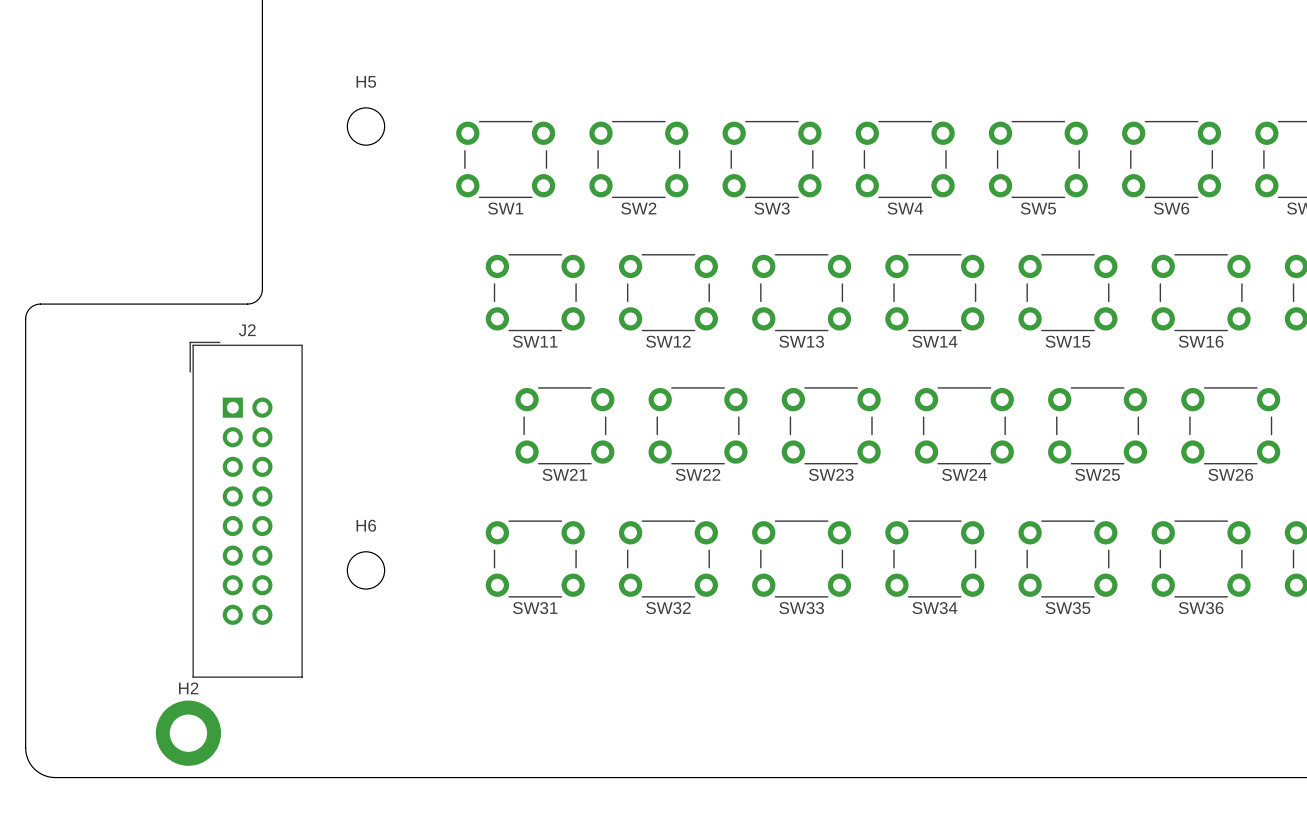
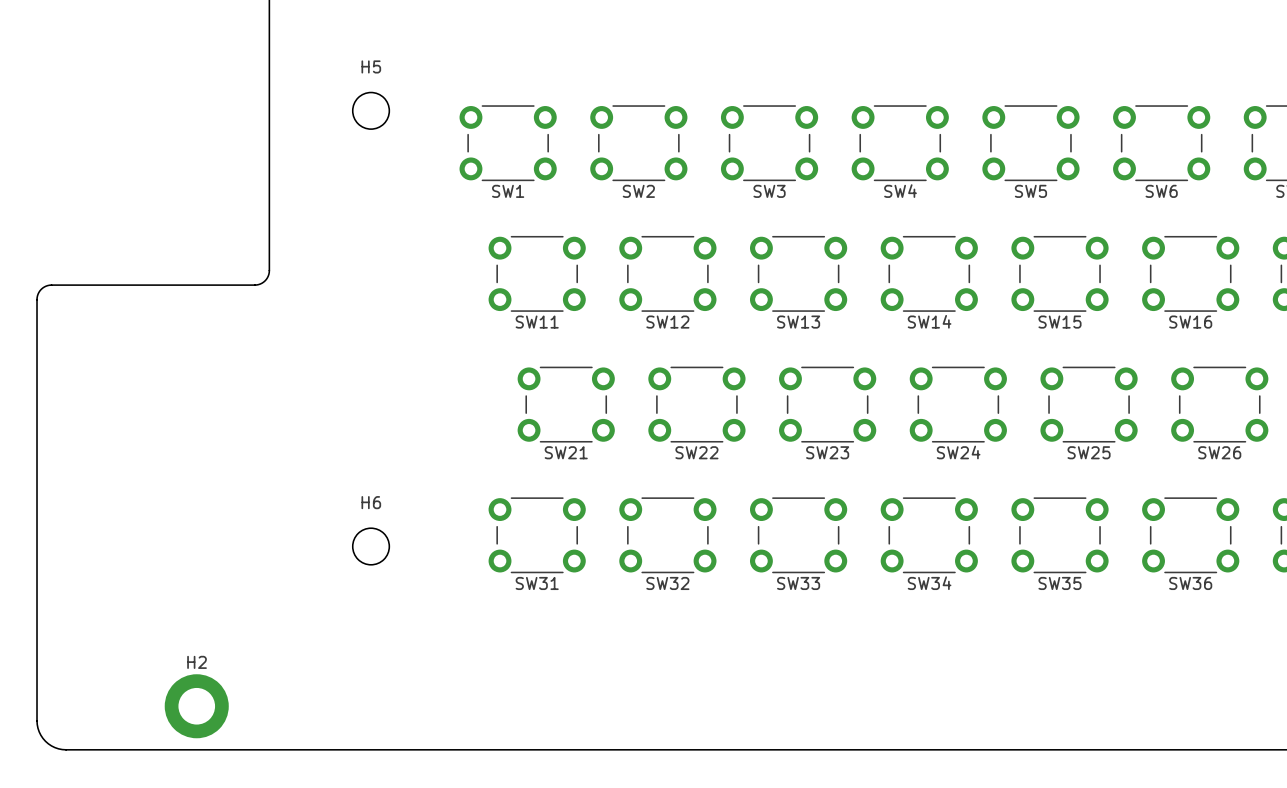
J2: (246, 509) -> none

